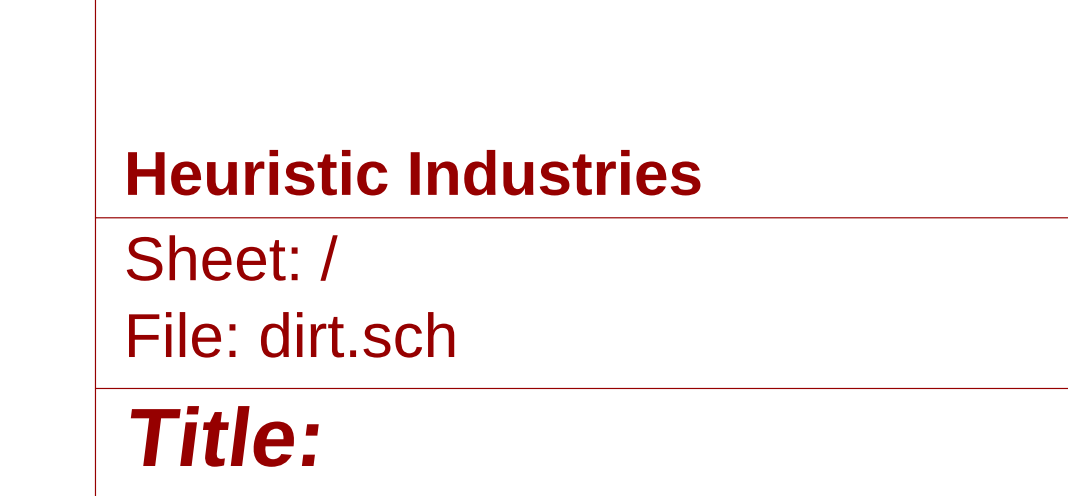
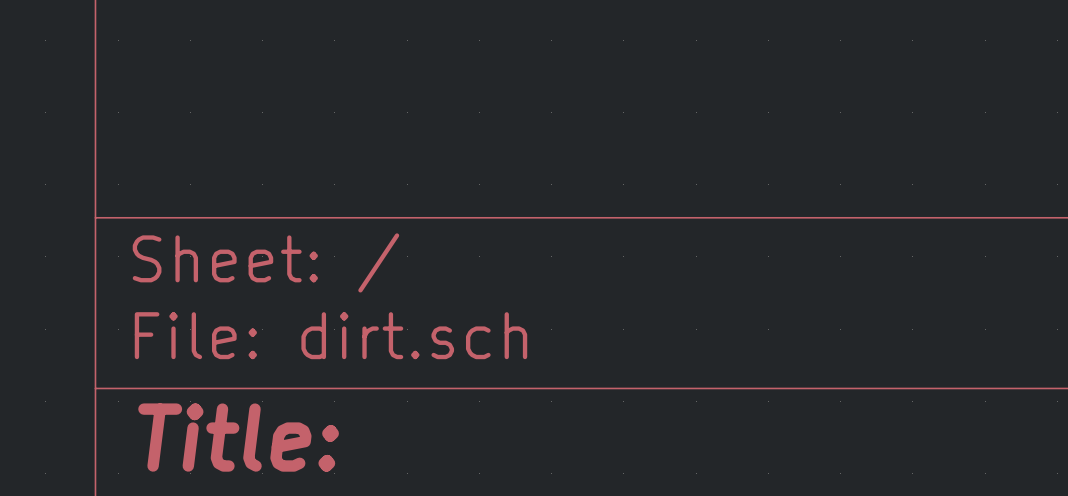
title block: Heuristic Industries (414, 172) -> none

